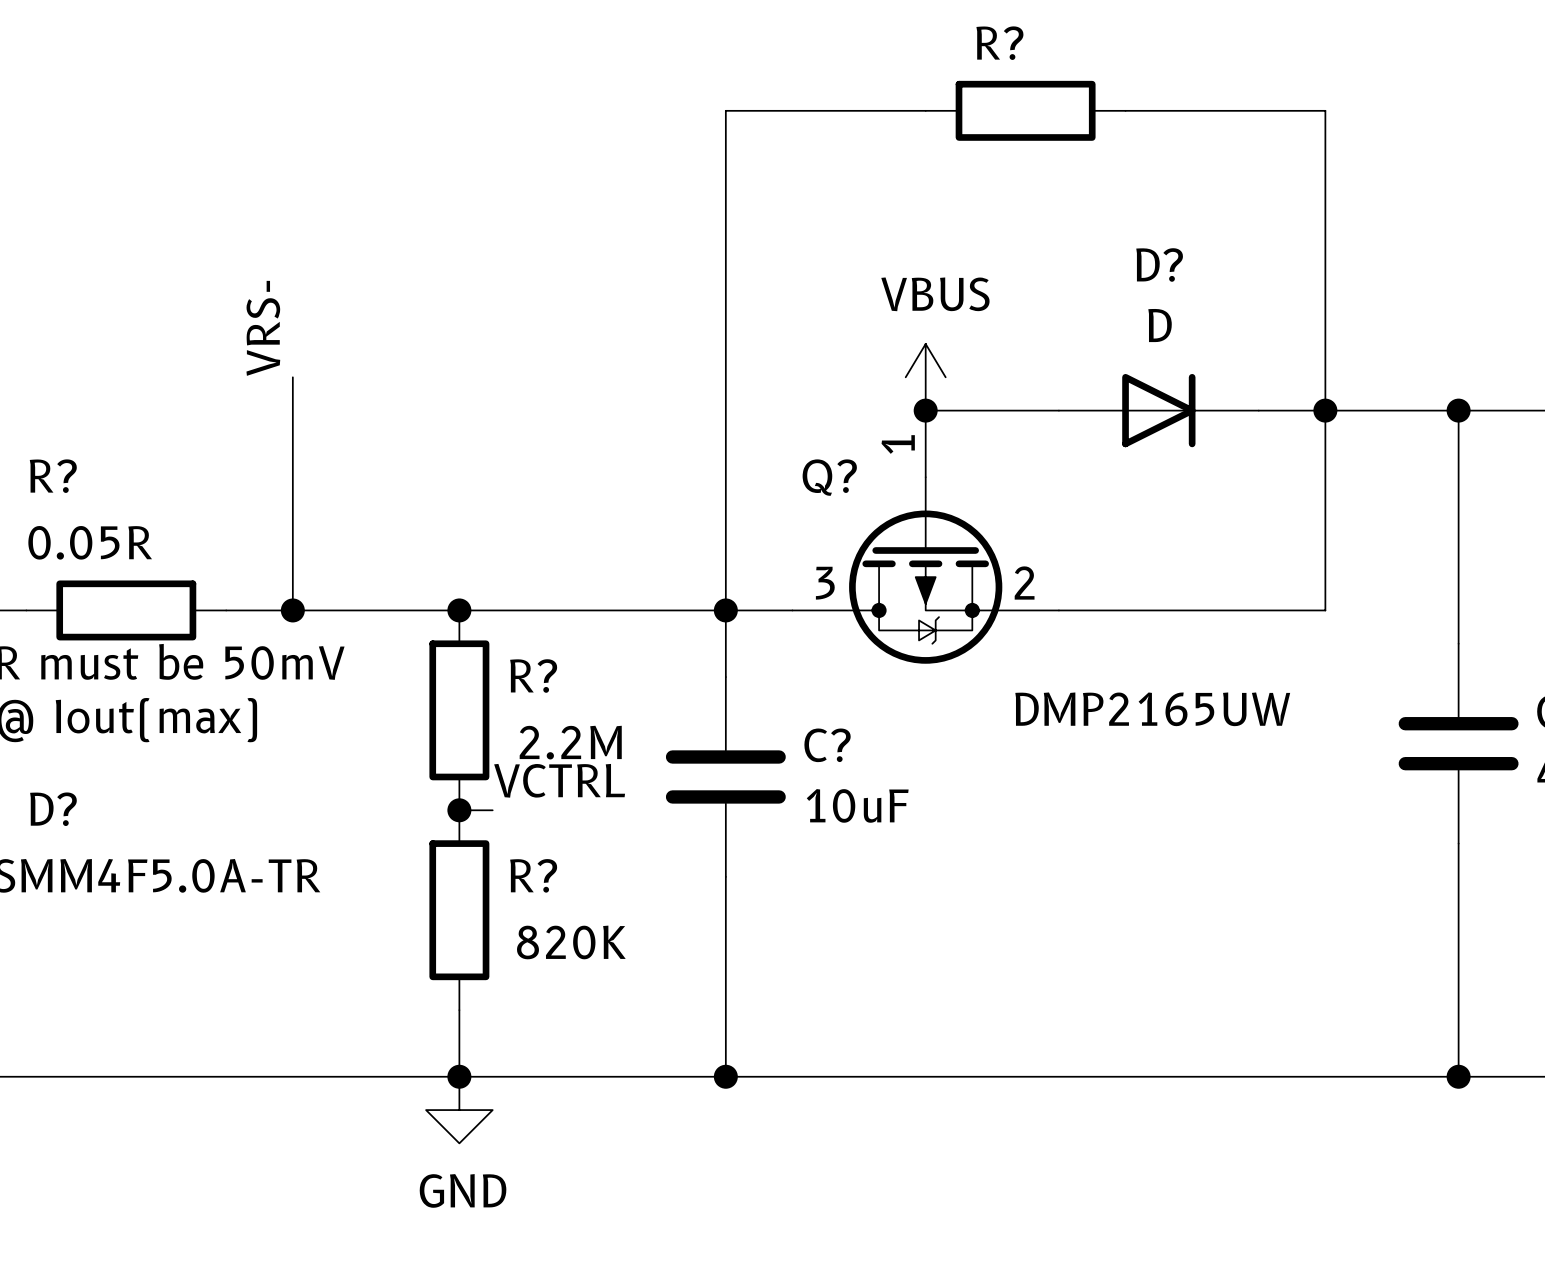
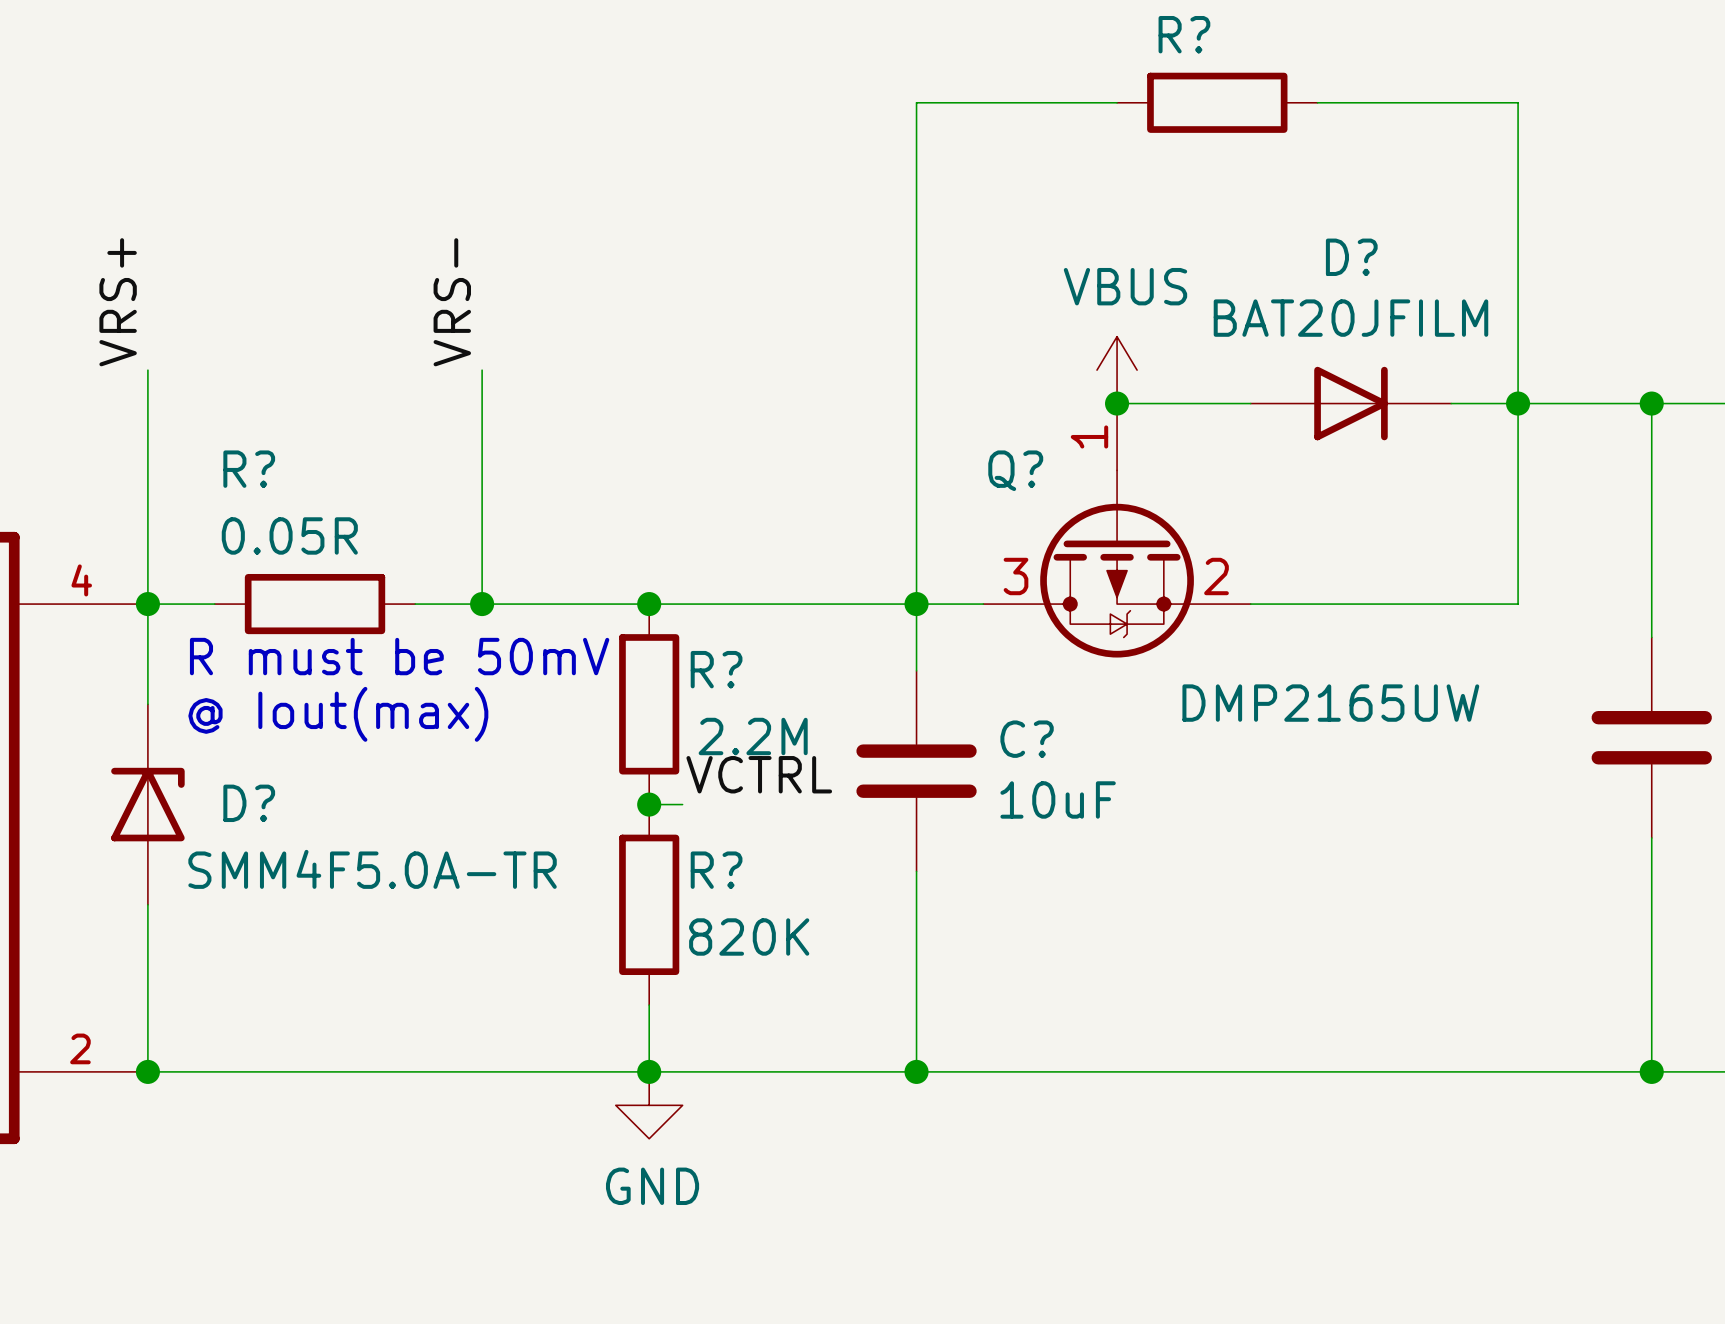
D? value: D (1160, 325) -> BAT20JFILM (1350, 318)

